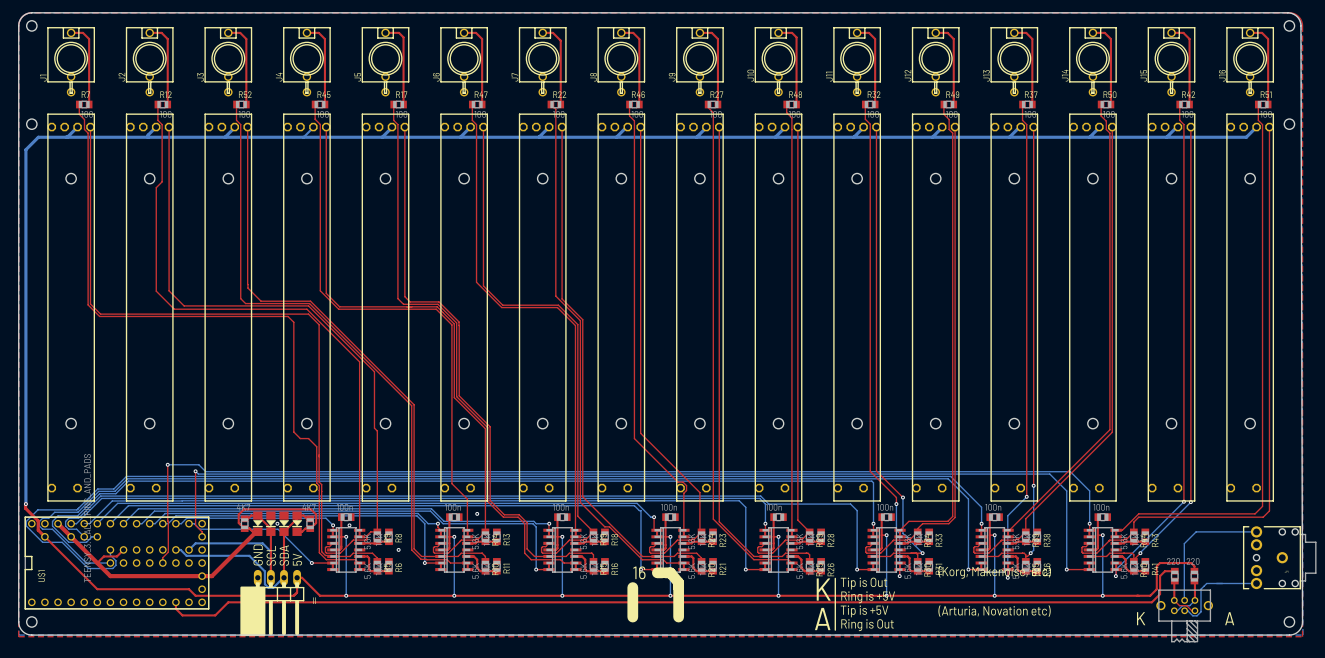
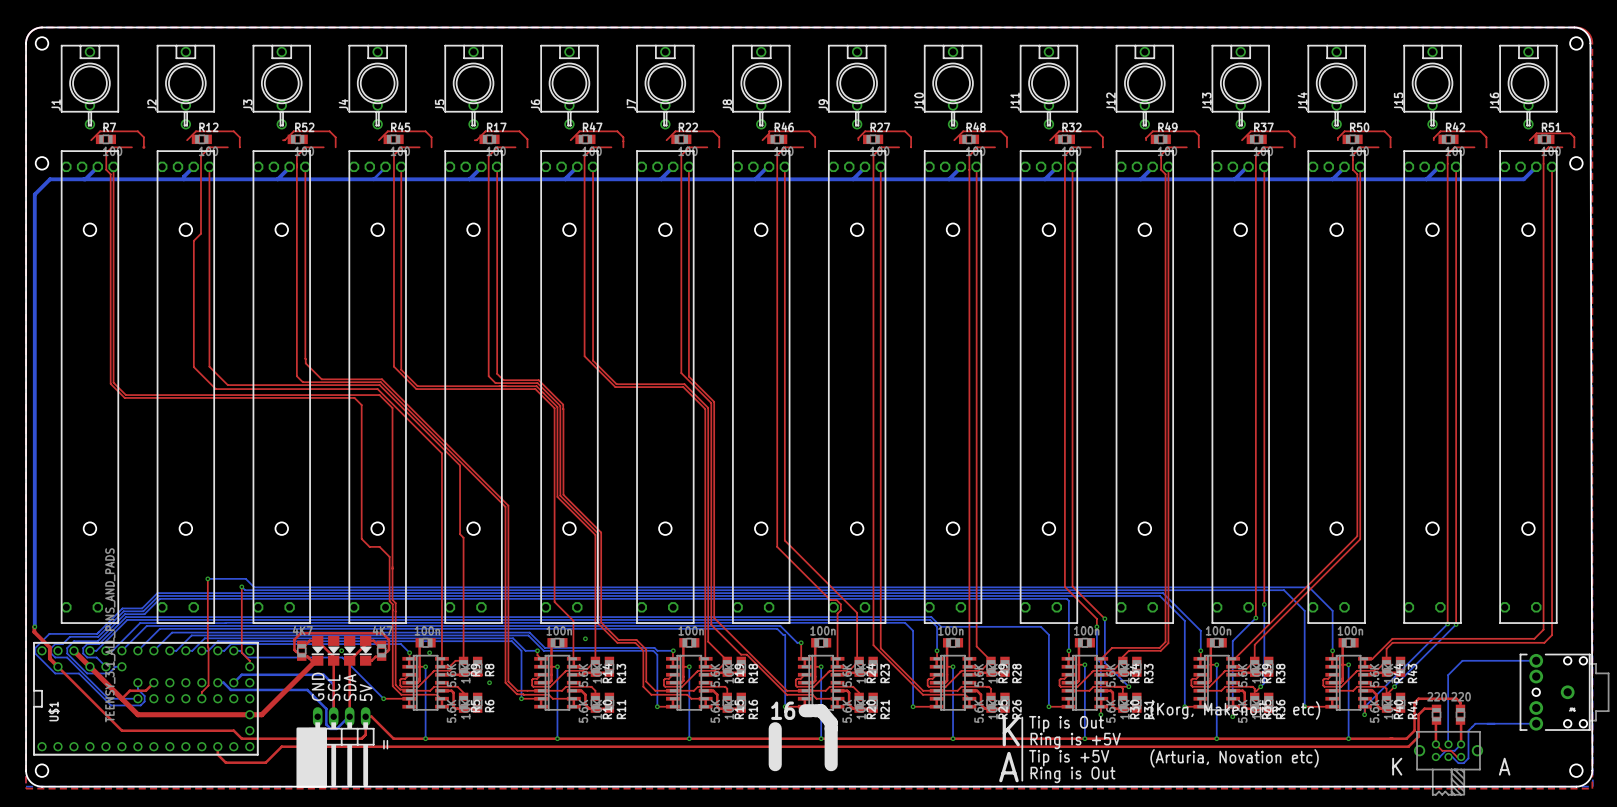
top track: (71, 32) (83, 32) (89, 39) (89, 104) -> none
top track: (149, 32) (161, 32) (167, 39) (167, 104) -> none
top track: (228, 32) (240, 32) (246, 39) (246, 104) -> none
top track: (306, 32) (318, 32) (324, 39) (324, 104) -> none
top track: (385, 32) (399, 32) (403, 37) (403, 104) -> none
top track: (464, 32) (476, 32) (482, 39) (482, 104) -> none
top track: (542, 32) (552, 32) (560, 40) (560, 104) -> none
top track: (621, 32) (633, 32) (639, 39) (639, 104) -> none
top track: (699, 32) (711, 32) (717, 39) (717, 104) -> none
top track: (778, 32) (792, 32) (796, 37) (796, 104) -> none
top track: (857, 32) (869, 32) (875, 39) (875, 104) -> none
top track: (935, 32) (947, 32) (953, 39) (953, 104) -> none
top track: (1014, 32) (1026, 32) (1032, 39) (1032, 104) -> none
top track: (1092, 32) (1104, 32) (1110, 39) (1110, 104) -> none
top track: (1171, 32) (1183, 32) (1189, 39) (1189, 104) -> none
top track: (1250, 32) (1262, 32) (1268, 39) (1268, 104) -> none
top track: (79, 104) (79, 114) (84, 119) -> (131, 147) (111, 147) (106, 152) (106, 157)
top track: (157, 104) (157, 120) (162, 124) -> (227, 147) (209, 147) (200, 156) (200, 163)
top track: (236, 104) (236, 120) (240, 124) -> (323, 147) (305, 147) (296, 156) (296, 163)
top track: (315, 104) (315, 119) (320, 124) -> (419, 147) (401, 147) (393, 154) (393, 163)
top track: (393, 104) (393, 120) (397, 124) -> (515, 147) (497, 147) (488, 156) (488, 163)
top track: (472, 104) (472, 120) (476, 124) -> (611, 147) (593, 147) (584, 156) (584, 163)
top track: (550, 104) (555, 109) (555, 117) -> (707, 147) (689, 147) (681, 155)
top track: (629, 104) (629, 115) (634, 120) -> (803, 147) (785, 147) (777, 155) (777, 159)
top track: (708, 104) (708, 107) (713, 112) (713, 117) -> (899, 147) (881, 147) (873, 155)
top track: (786, 104) (786, 112) (791, 117) -> (995, 147) (977, 147) (969, 155)
top track: (865, 104) (865, 119) (870, 124) -> (1090, 147) (1072, 147) (1064, 155) (1064, 163)
top track: (943, 104) (943, 114) (949, 119) -> (1186, 147) (1168, 147) (1161, 154) (1161, 157)
top track: (1022, 104) (1022, 120) (1026, 124) -> (1282, 147) (1264, 147) (1255, 156) (1255, 163)
top track: (1101, 104) (1101, 115) (1106, 121) -> (1378, 147) (1360, 147) (1352, 154) (1352, 159)
top track: (1179, 104) (1179, 120) (1183, 124) -> (1474, 147) (1454, 147) (1447, 154) (1447, 163)
top track: (1258, 104) (1258, 120) (1262, 124) -> (1562, 147) (1548, 147) (1543, 152) (1543, 163)
top track: none -> (91, 140) (100, 131) (137, 131) (143, 137) (143, 147)
top track: none -> (187, 140) (196, 131) (233, 131) (239, 137) (239, 147)
top track: none -> (283, 140) (293, 131) (329, 131) (335, 137) (335, 147)
top track: none -> (378, 140) (387, 131) (425, 131) (431, 137) (431, 147)
top track: none -> (474, 140) (485, 131) (519, 131) (527, 139) (527, 147)
top track: none -> (570, 140) (579, 131) (617, 131) (623, 137) (623, 147)
top track: none -> (666, 140) (675, 131) (713, 131) (719, 137) (719, 147)
top track: none -> (762, 140) (769, 131) (809, 131) (815, 137) (815, 147)
top track: none -> (858, 140) (865, 131) (905, 131) (911, 137) (911, 147)
top track: none -> (954, 140) (963, 131) (1000, 131) (1006, 137) (1006, 147)
top track: none -> (1050, 140) (1059, 131) (1096, 131) (1102, 137) (1102, 147)
top track: none -> (1146, 140) (1152, 131) (1194, 131) (1198, 135) (1198, 147)
top track: none -> (1241, 140) (1250, 131) (1288, 131) (1294, 137) (1294, 147)
top track: none -> (1337, 140) (1344, 131) (1384, 131) (1390, 137) (1390, 147)
top track: none -> (1433, 140) (1440, 131) (1480, 131) (1486, 137) (1486, 147)
top track: none -> (1529, 140) (1536, 133) (1570, 133) (1574, 137) (1574, 147)

